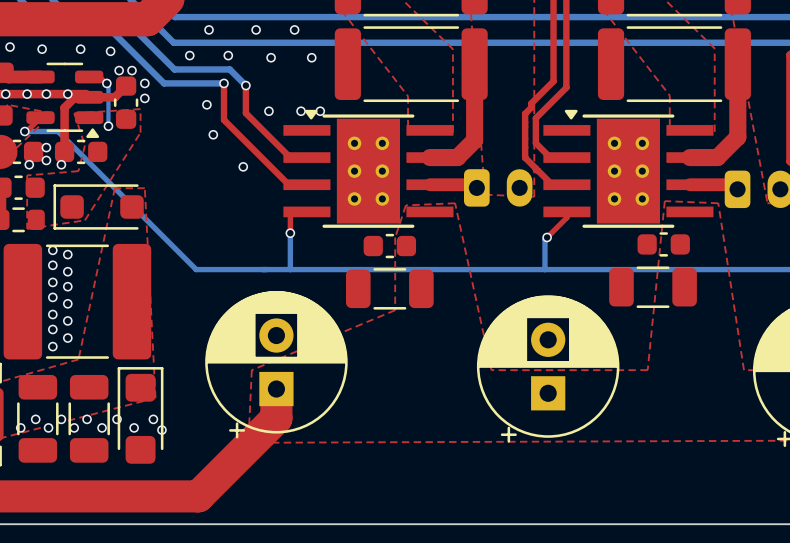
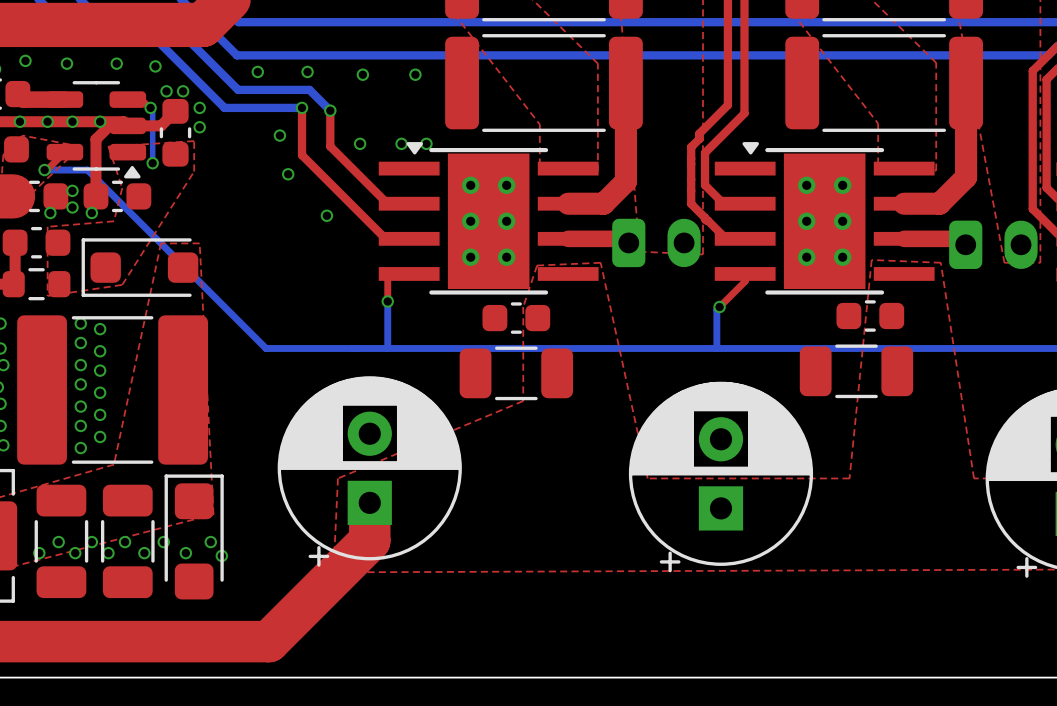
via: (209, 29) -> none
via: (256, 29) -> none
via: (294, 29) -> none

